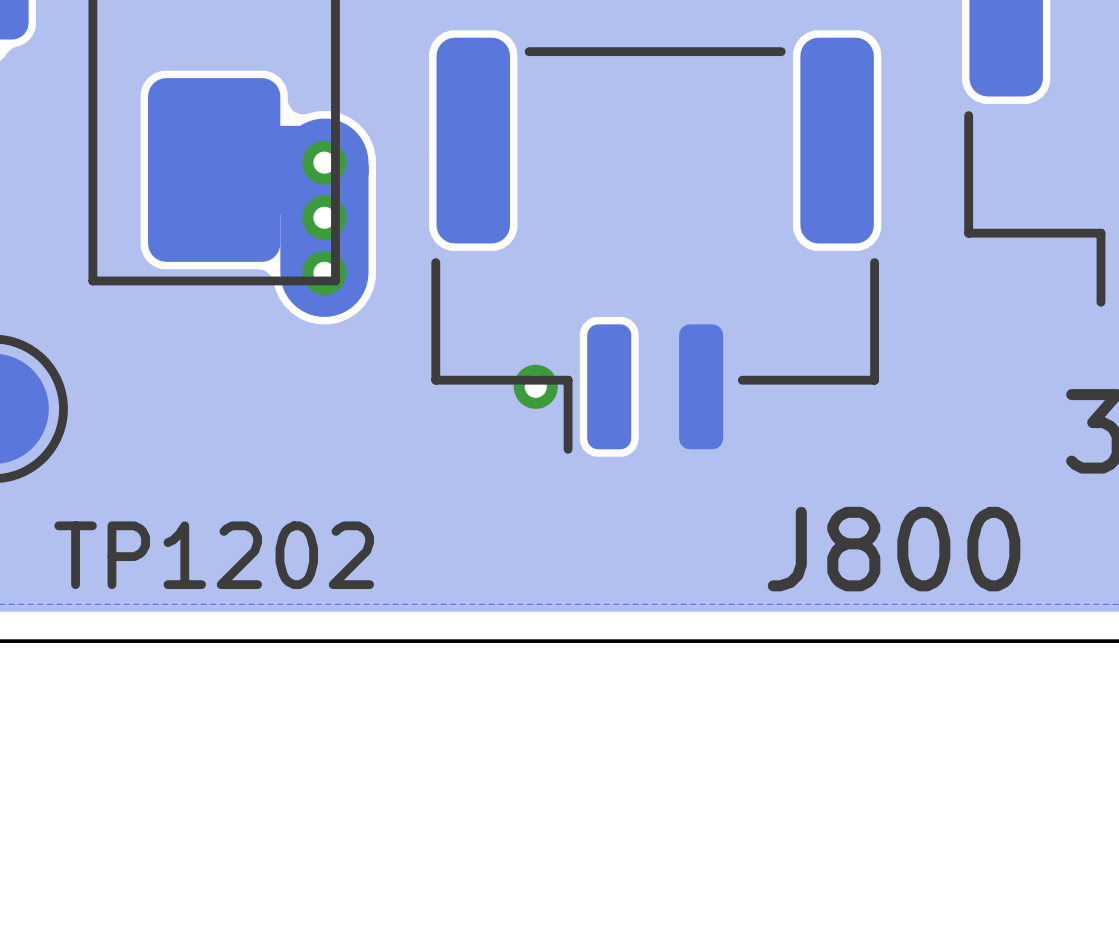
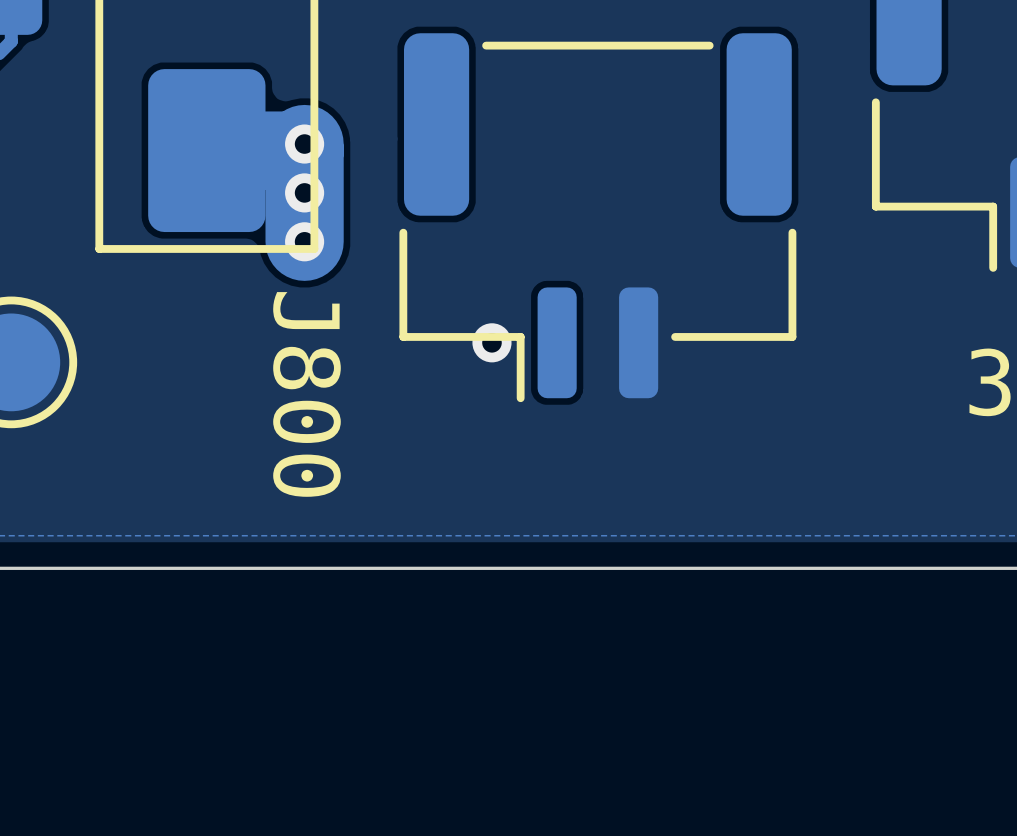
J800 name rotation: 0° (894, 549) -> 90° clockwise (306, 394)
J800 name position: J800 (894, 549) -> J800 (306, 394)
TP1202 name: TP1202 (214, 555) -> none

